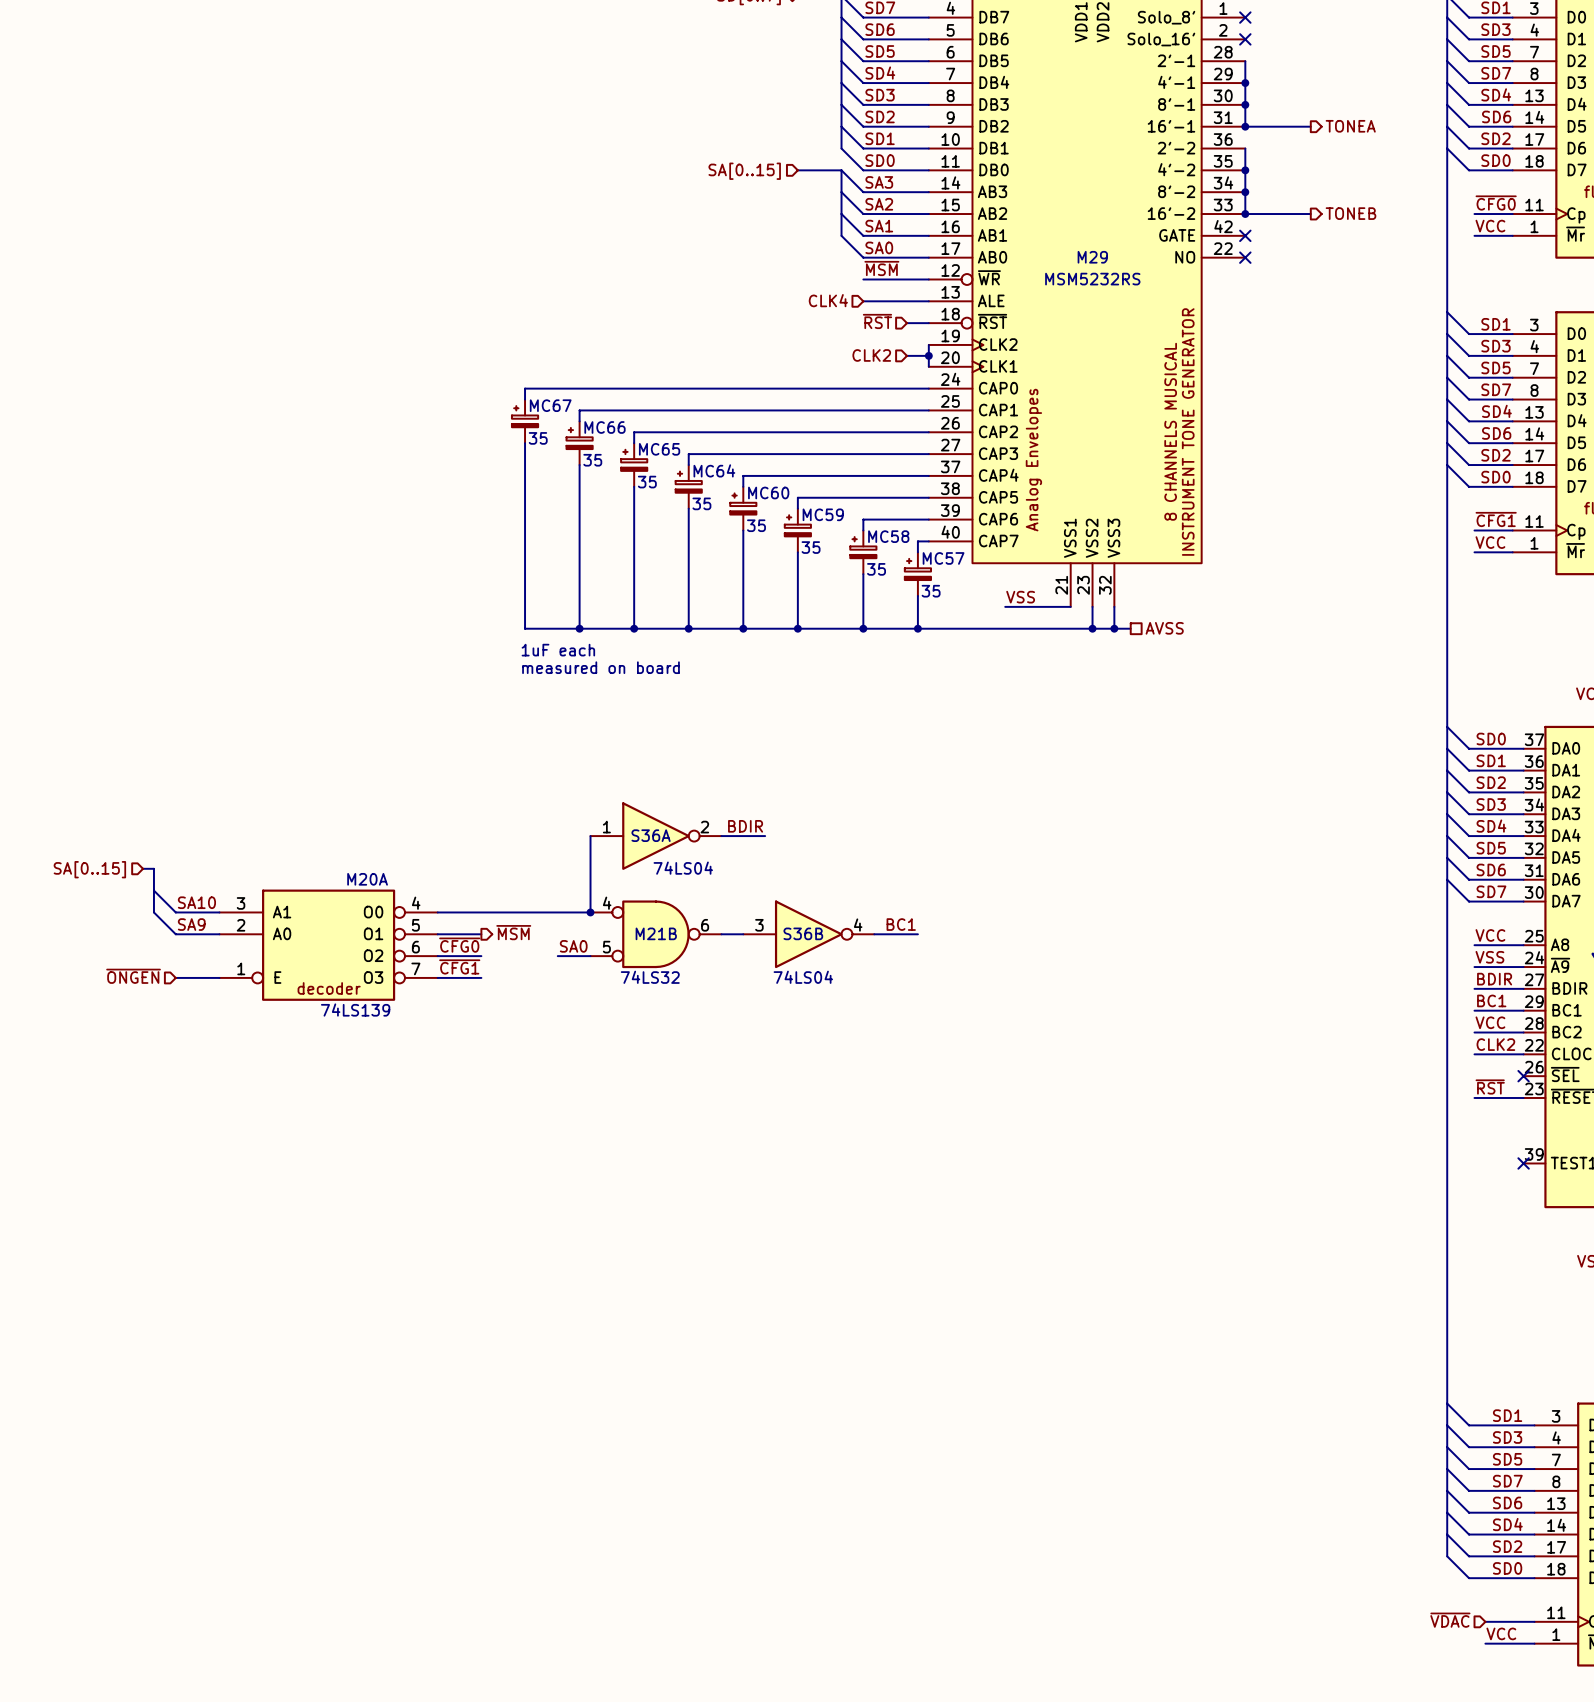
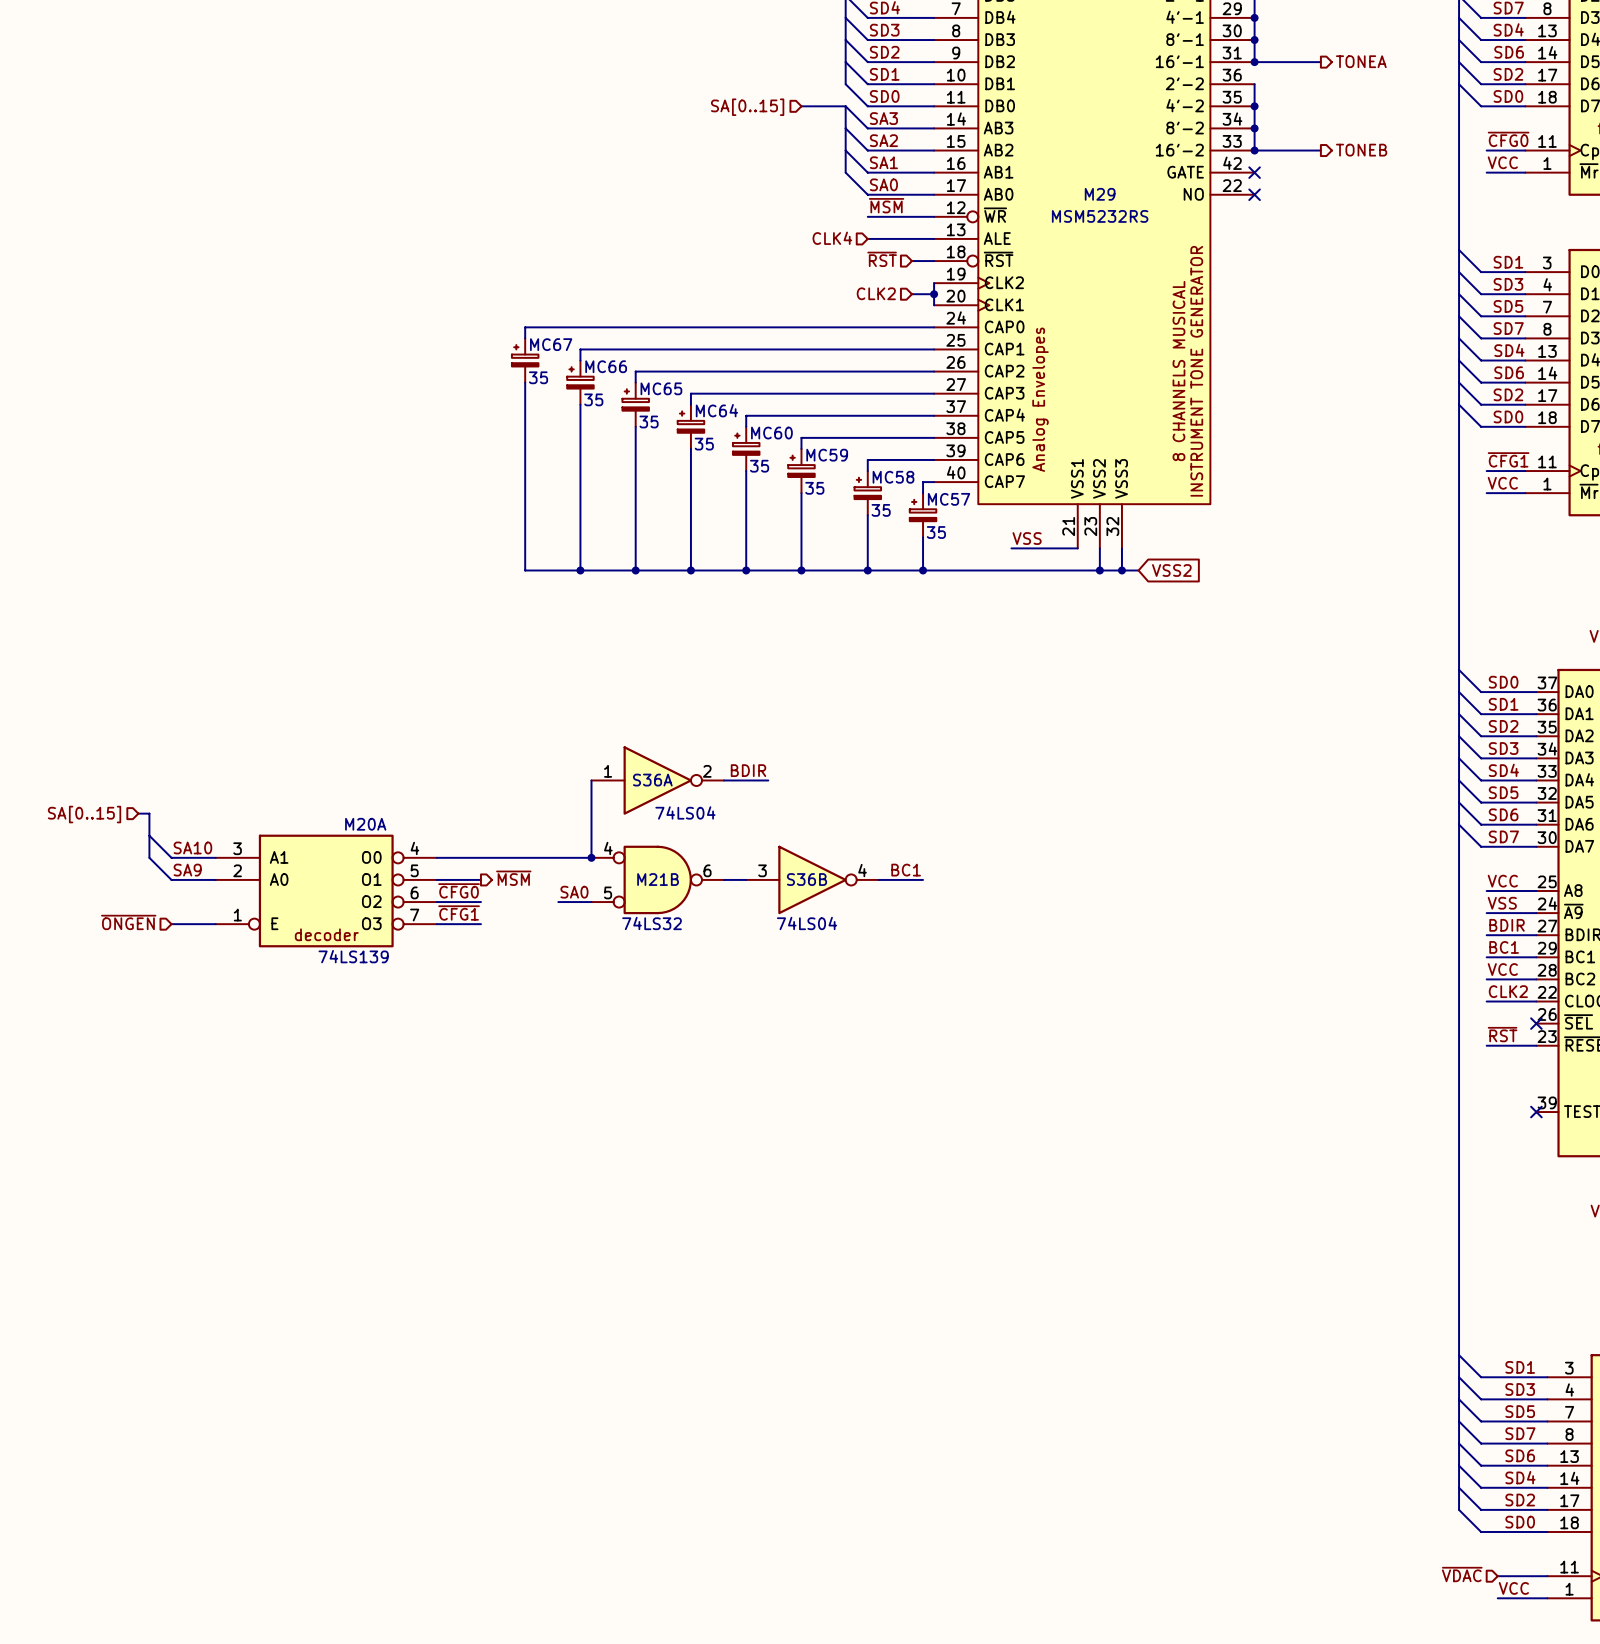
global label: none -> VSS2 (1171, 570)
hierarchical label: AVSS (1164, 628) -> none
text: 1uF each (558, 650) -> none
text: measured on board (600, 667) -> none

